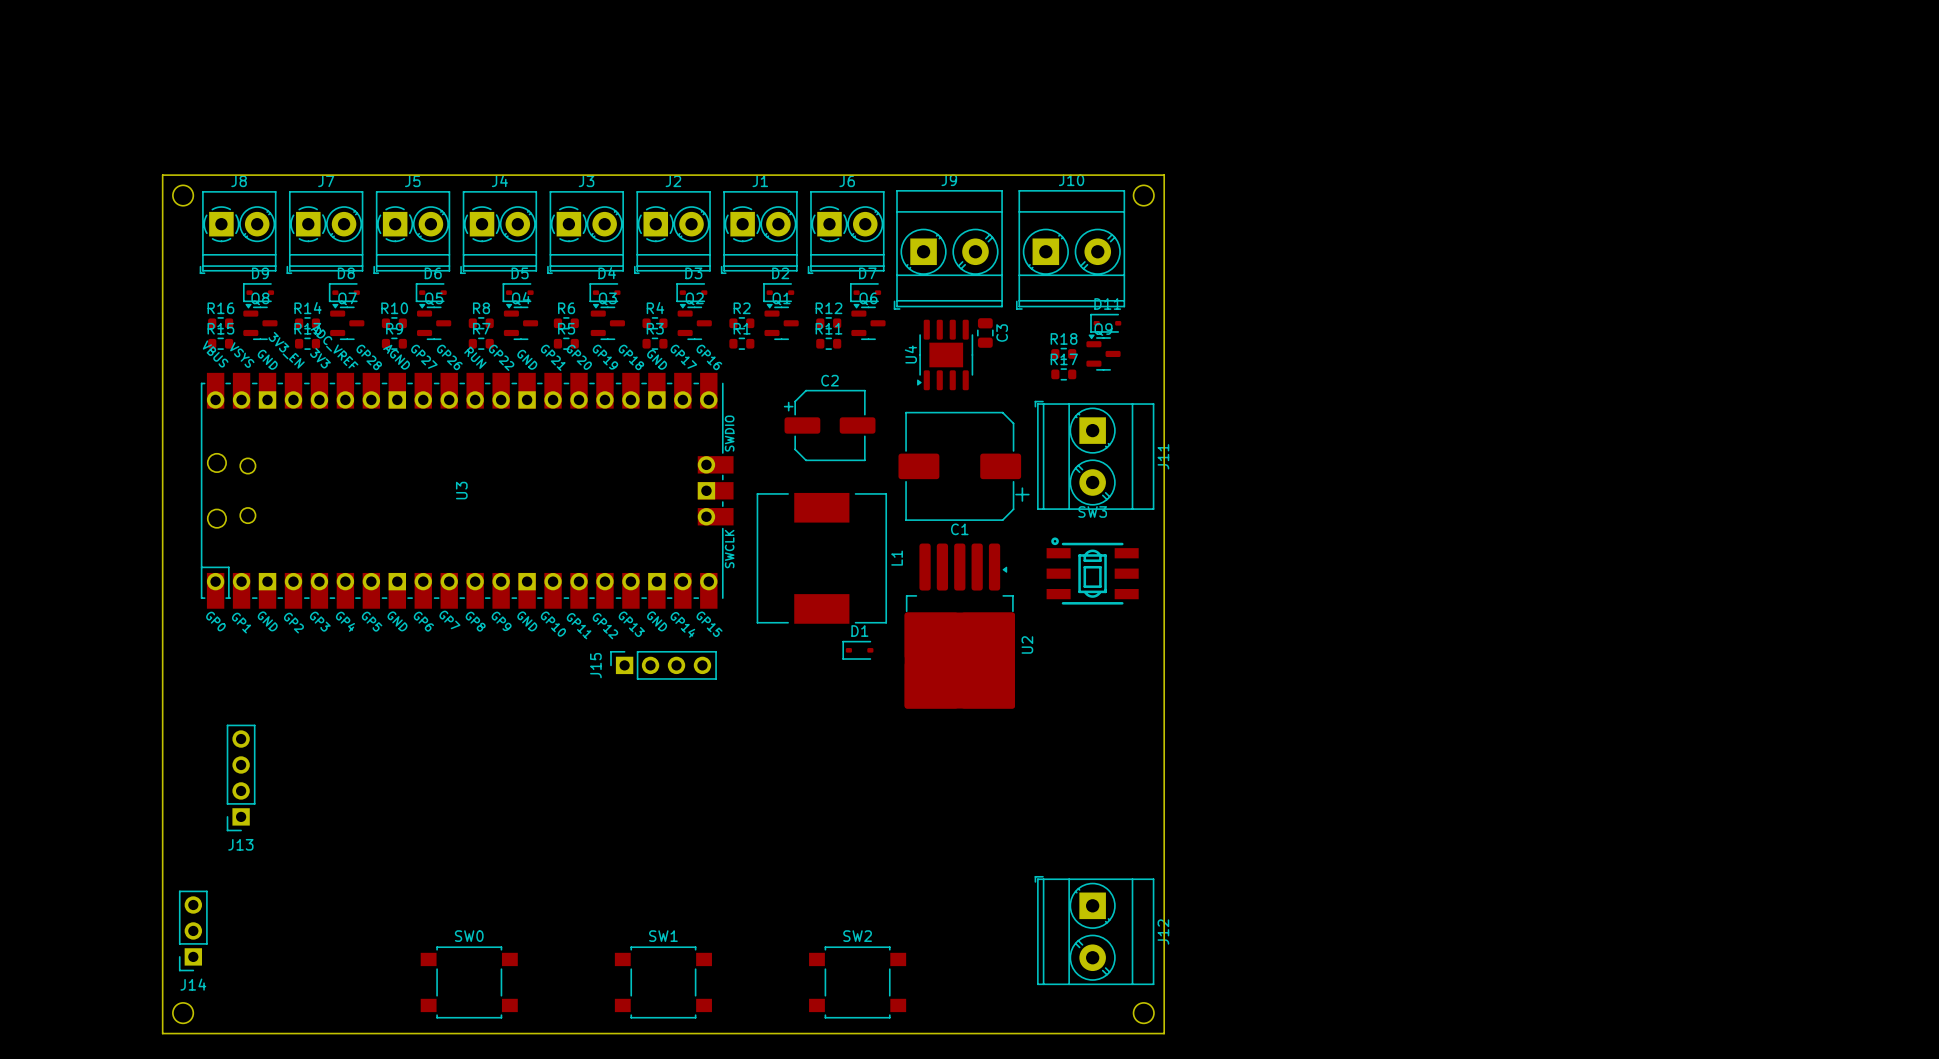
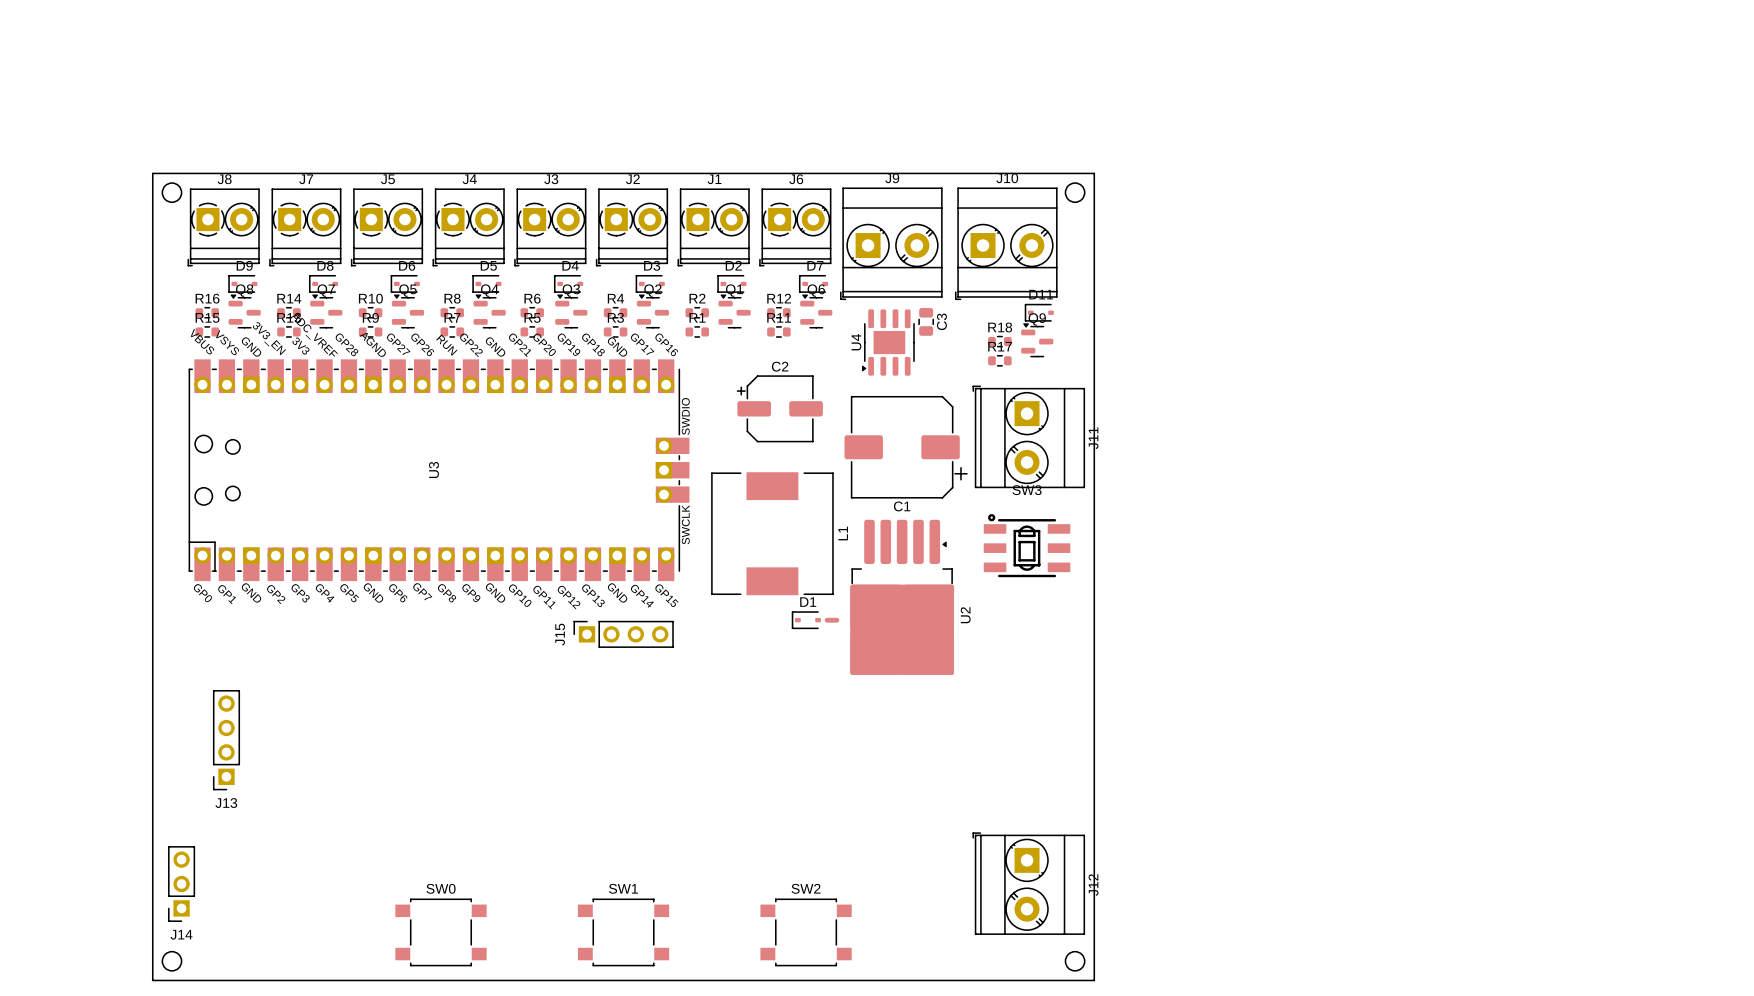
part: none -> (832, 620)

